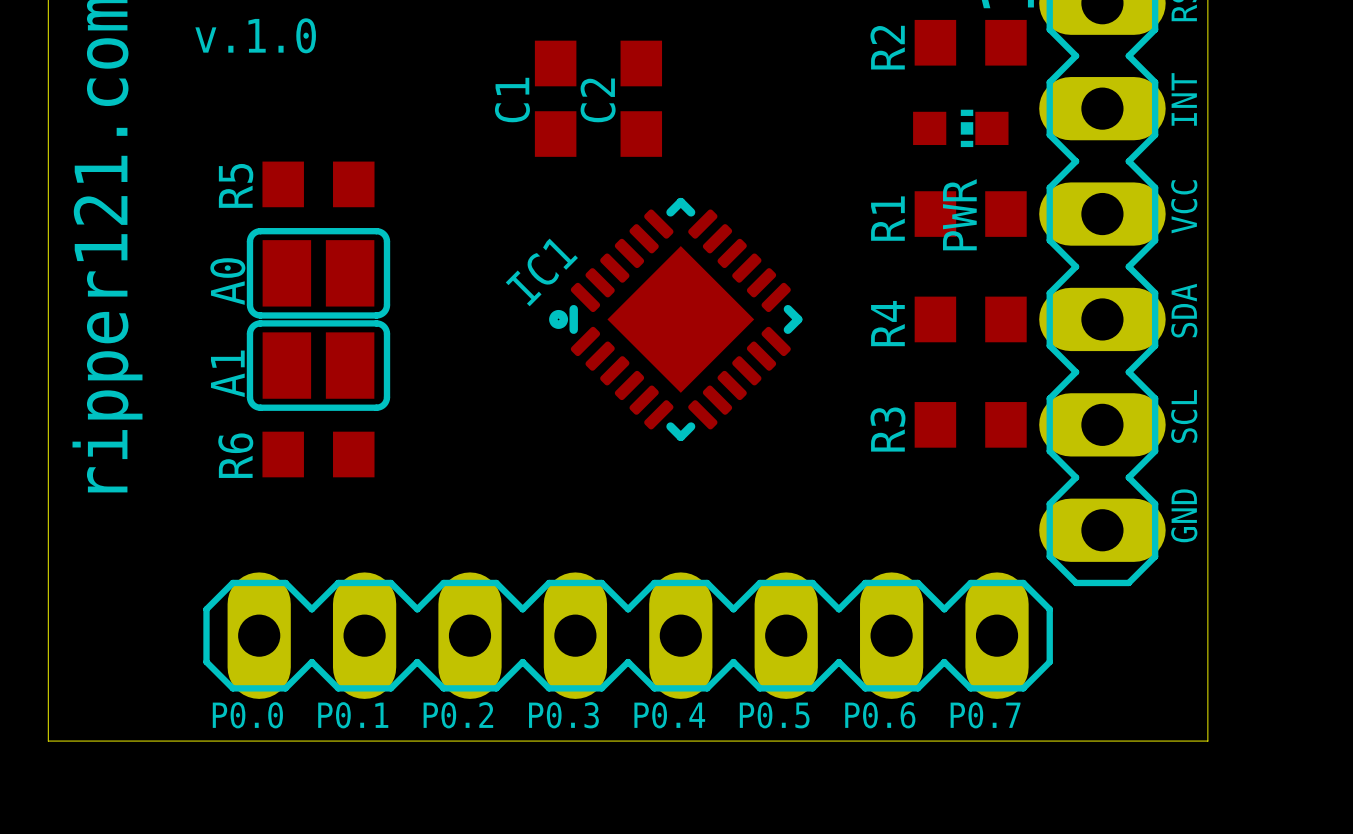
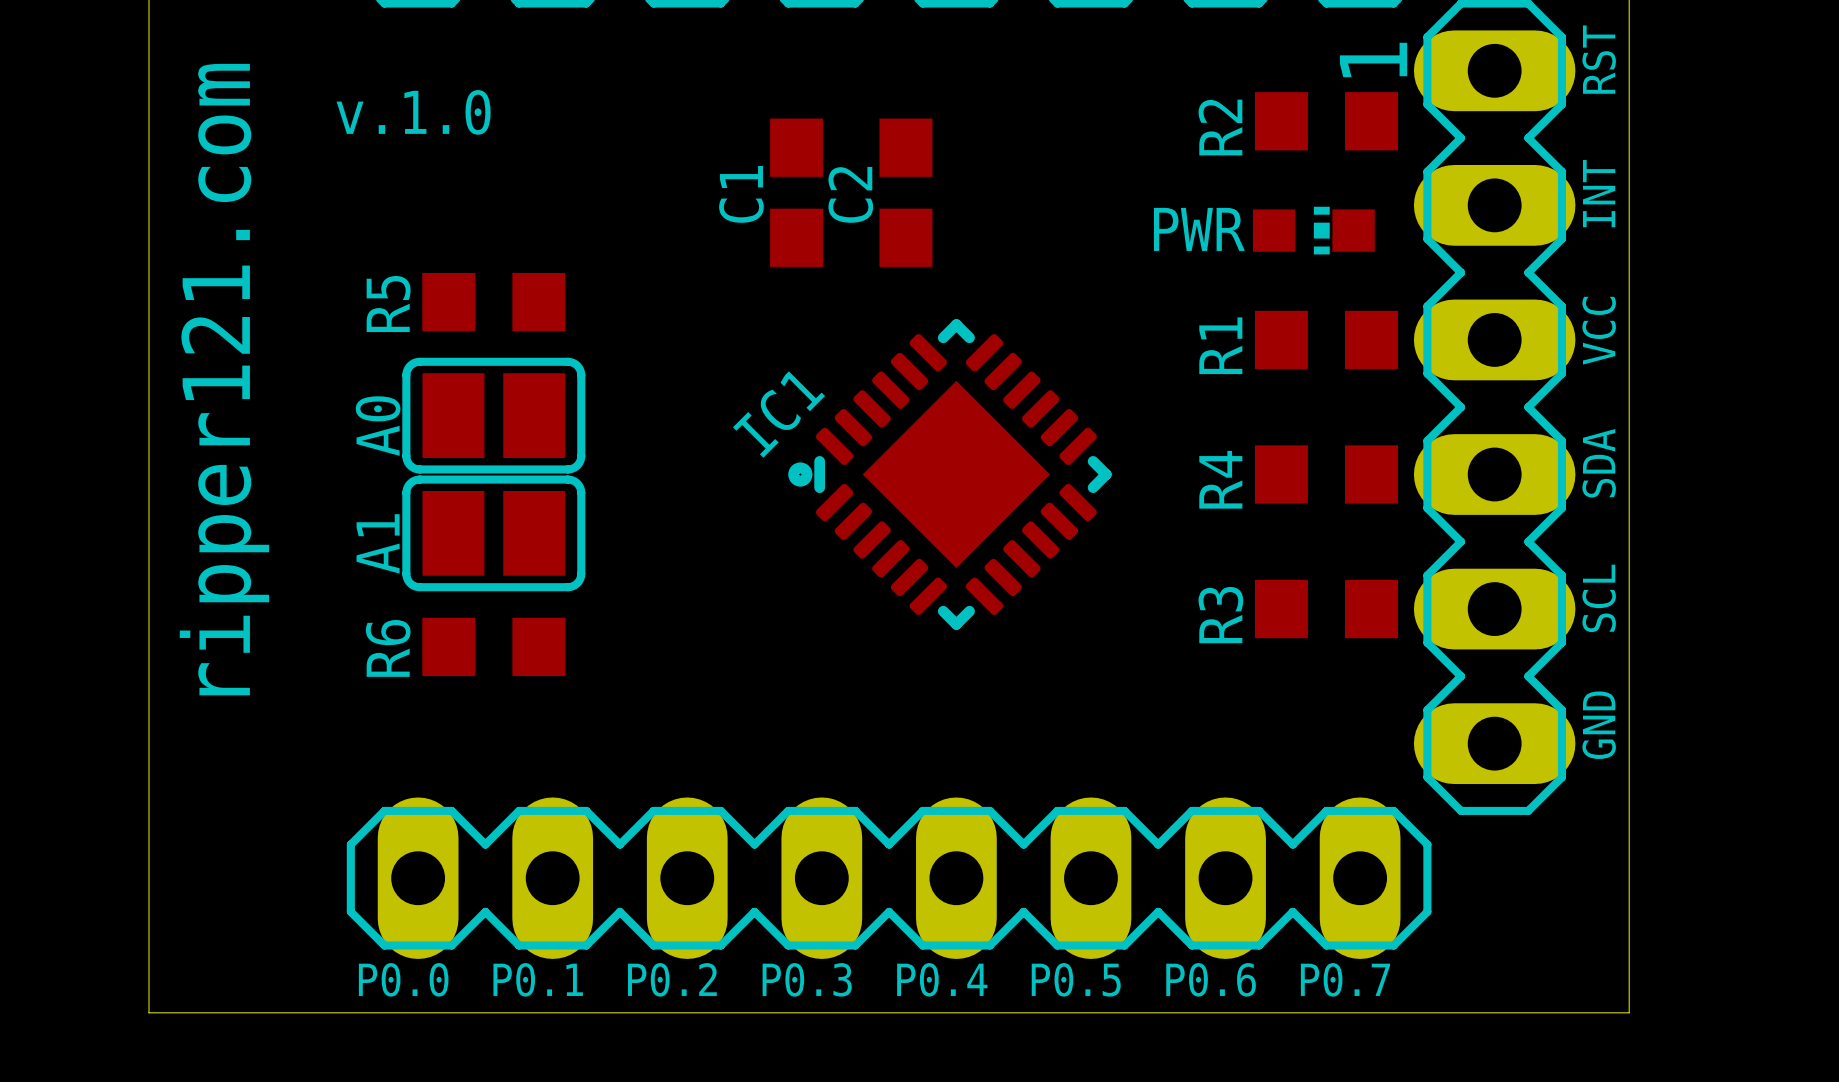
PWR name rotation: 0° (959, 214) -> 90° clockwise (1199, 229)
PWR name position: PWR (959, 214) -> PWR (1199, 229)

